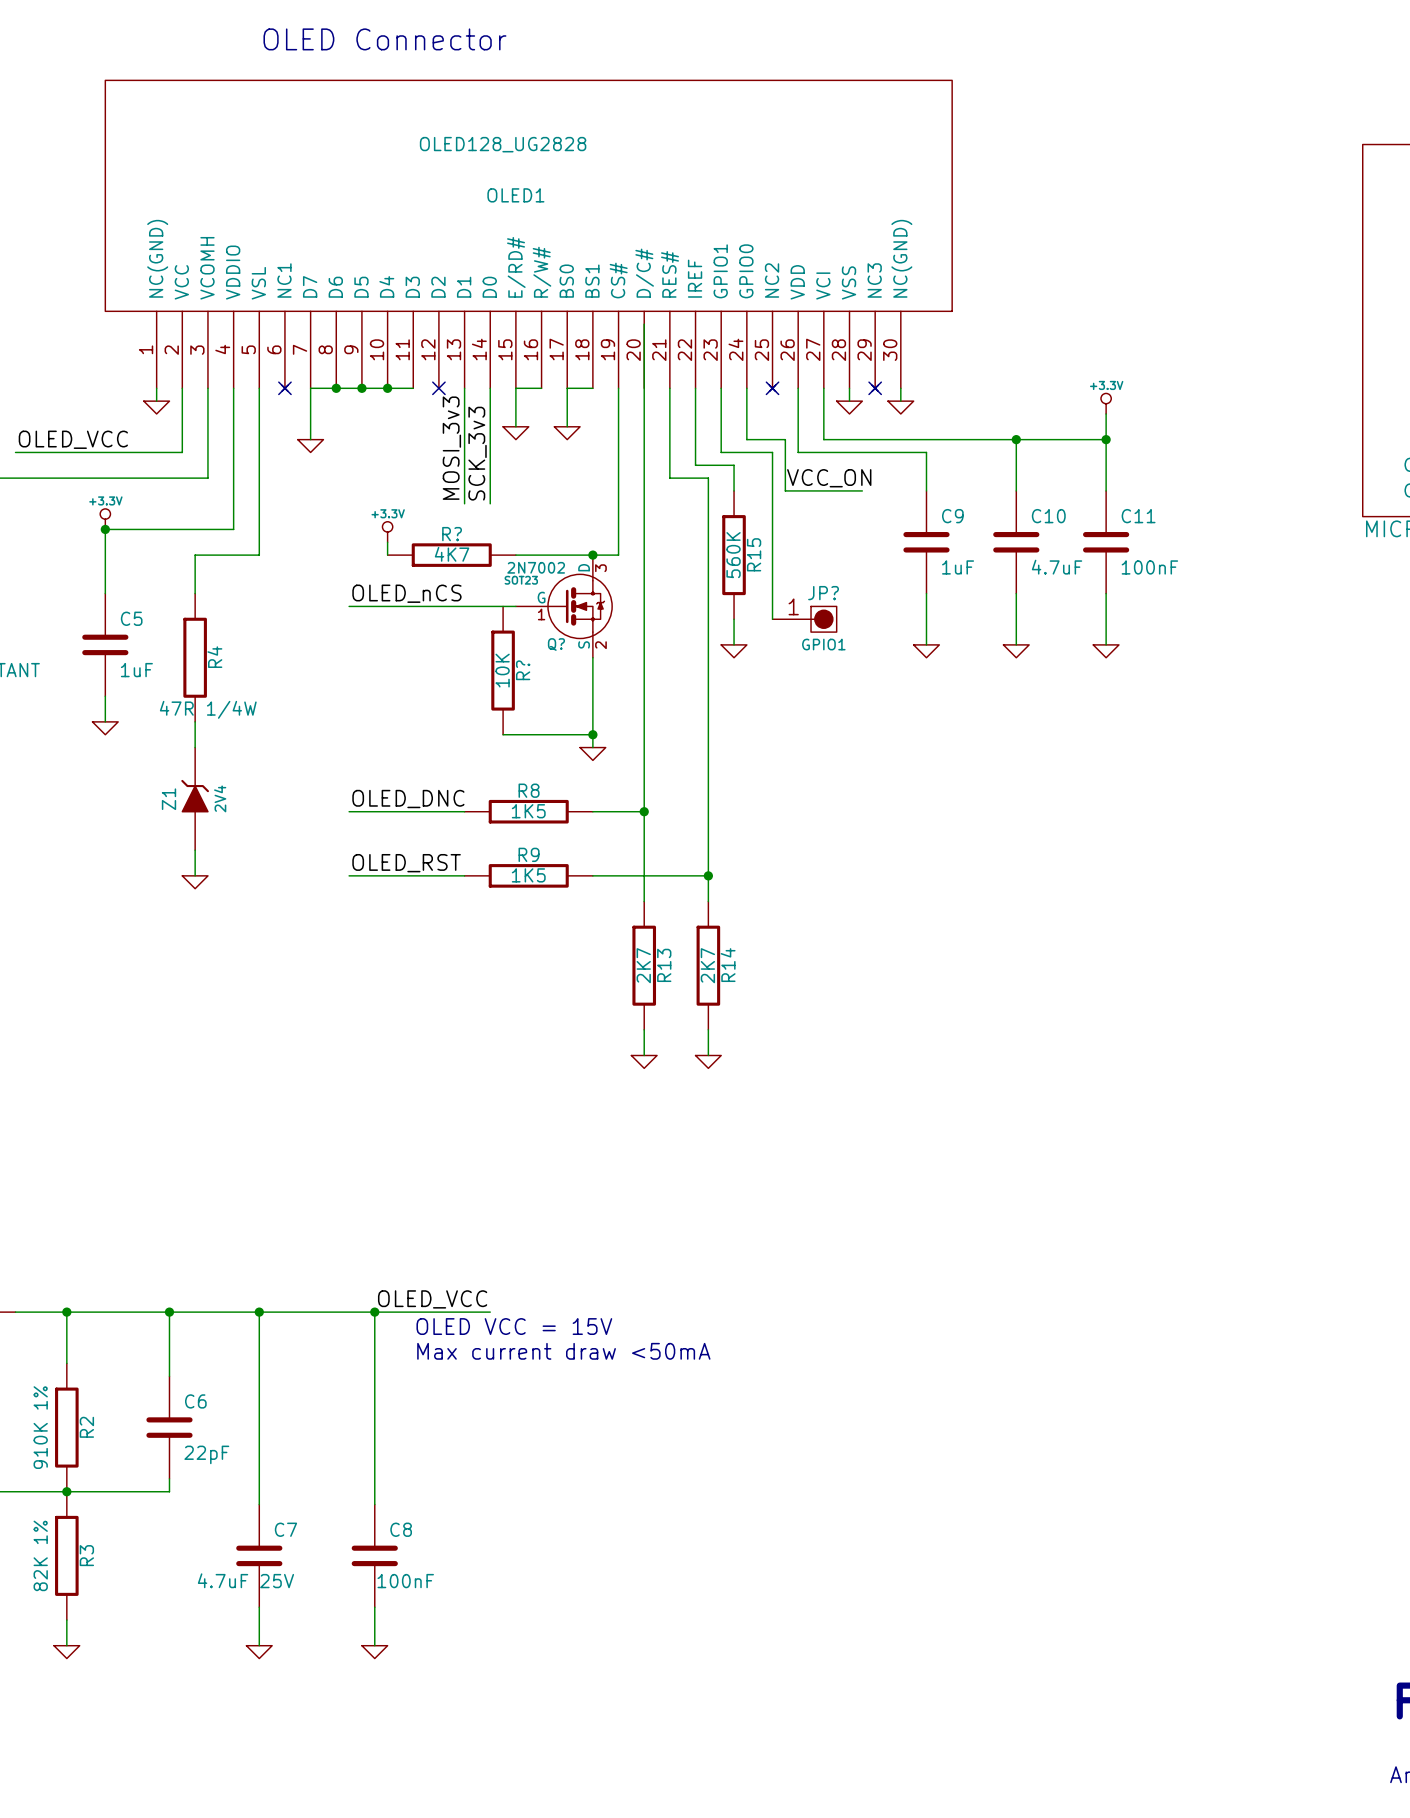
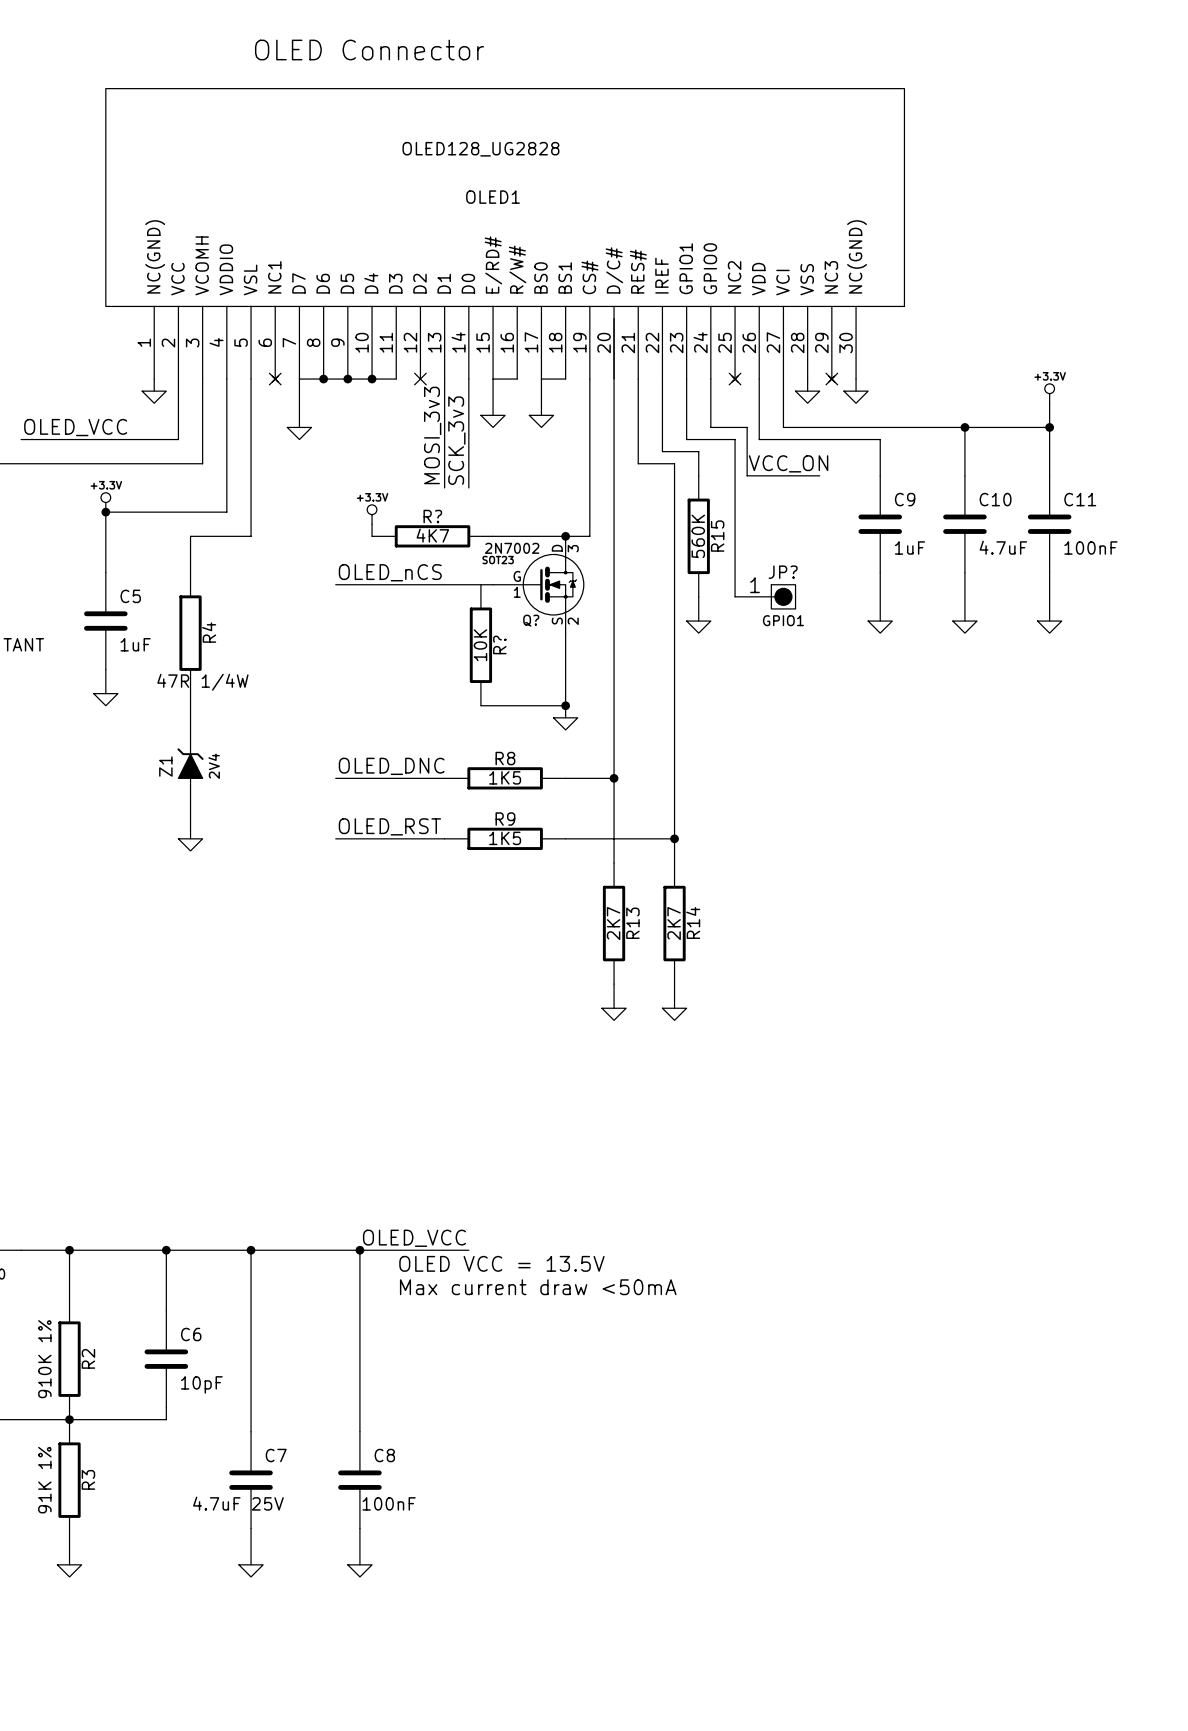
text: OLED VCC = 15V (514, 1326) -> OLED VCC = 13.5V (501, 1263)
C6 value: 22pF (206, 1454) -> 10pF (201, 1384)
R3 value: 82K 1% (40, 1555) -> 91K 1% (44, 1480)

